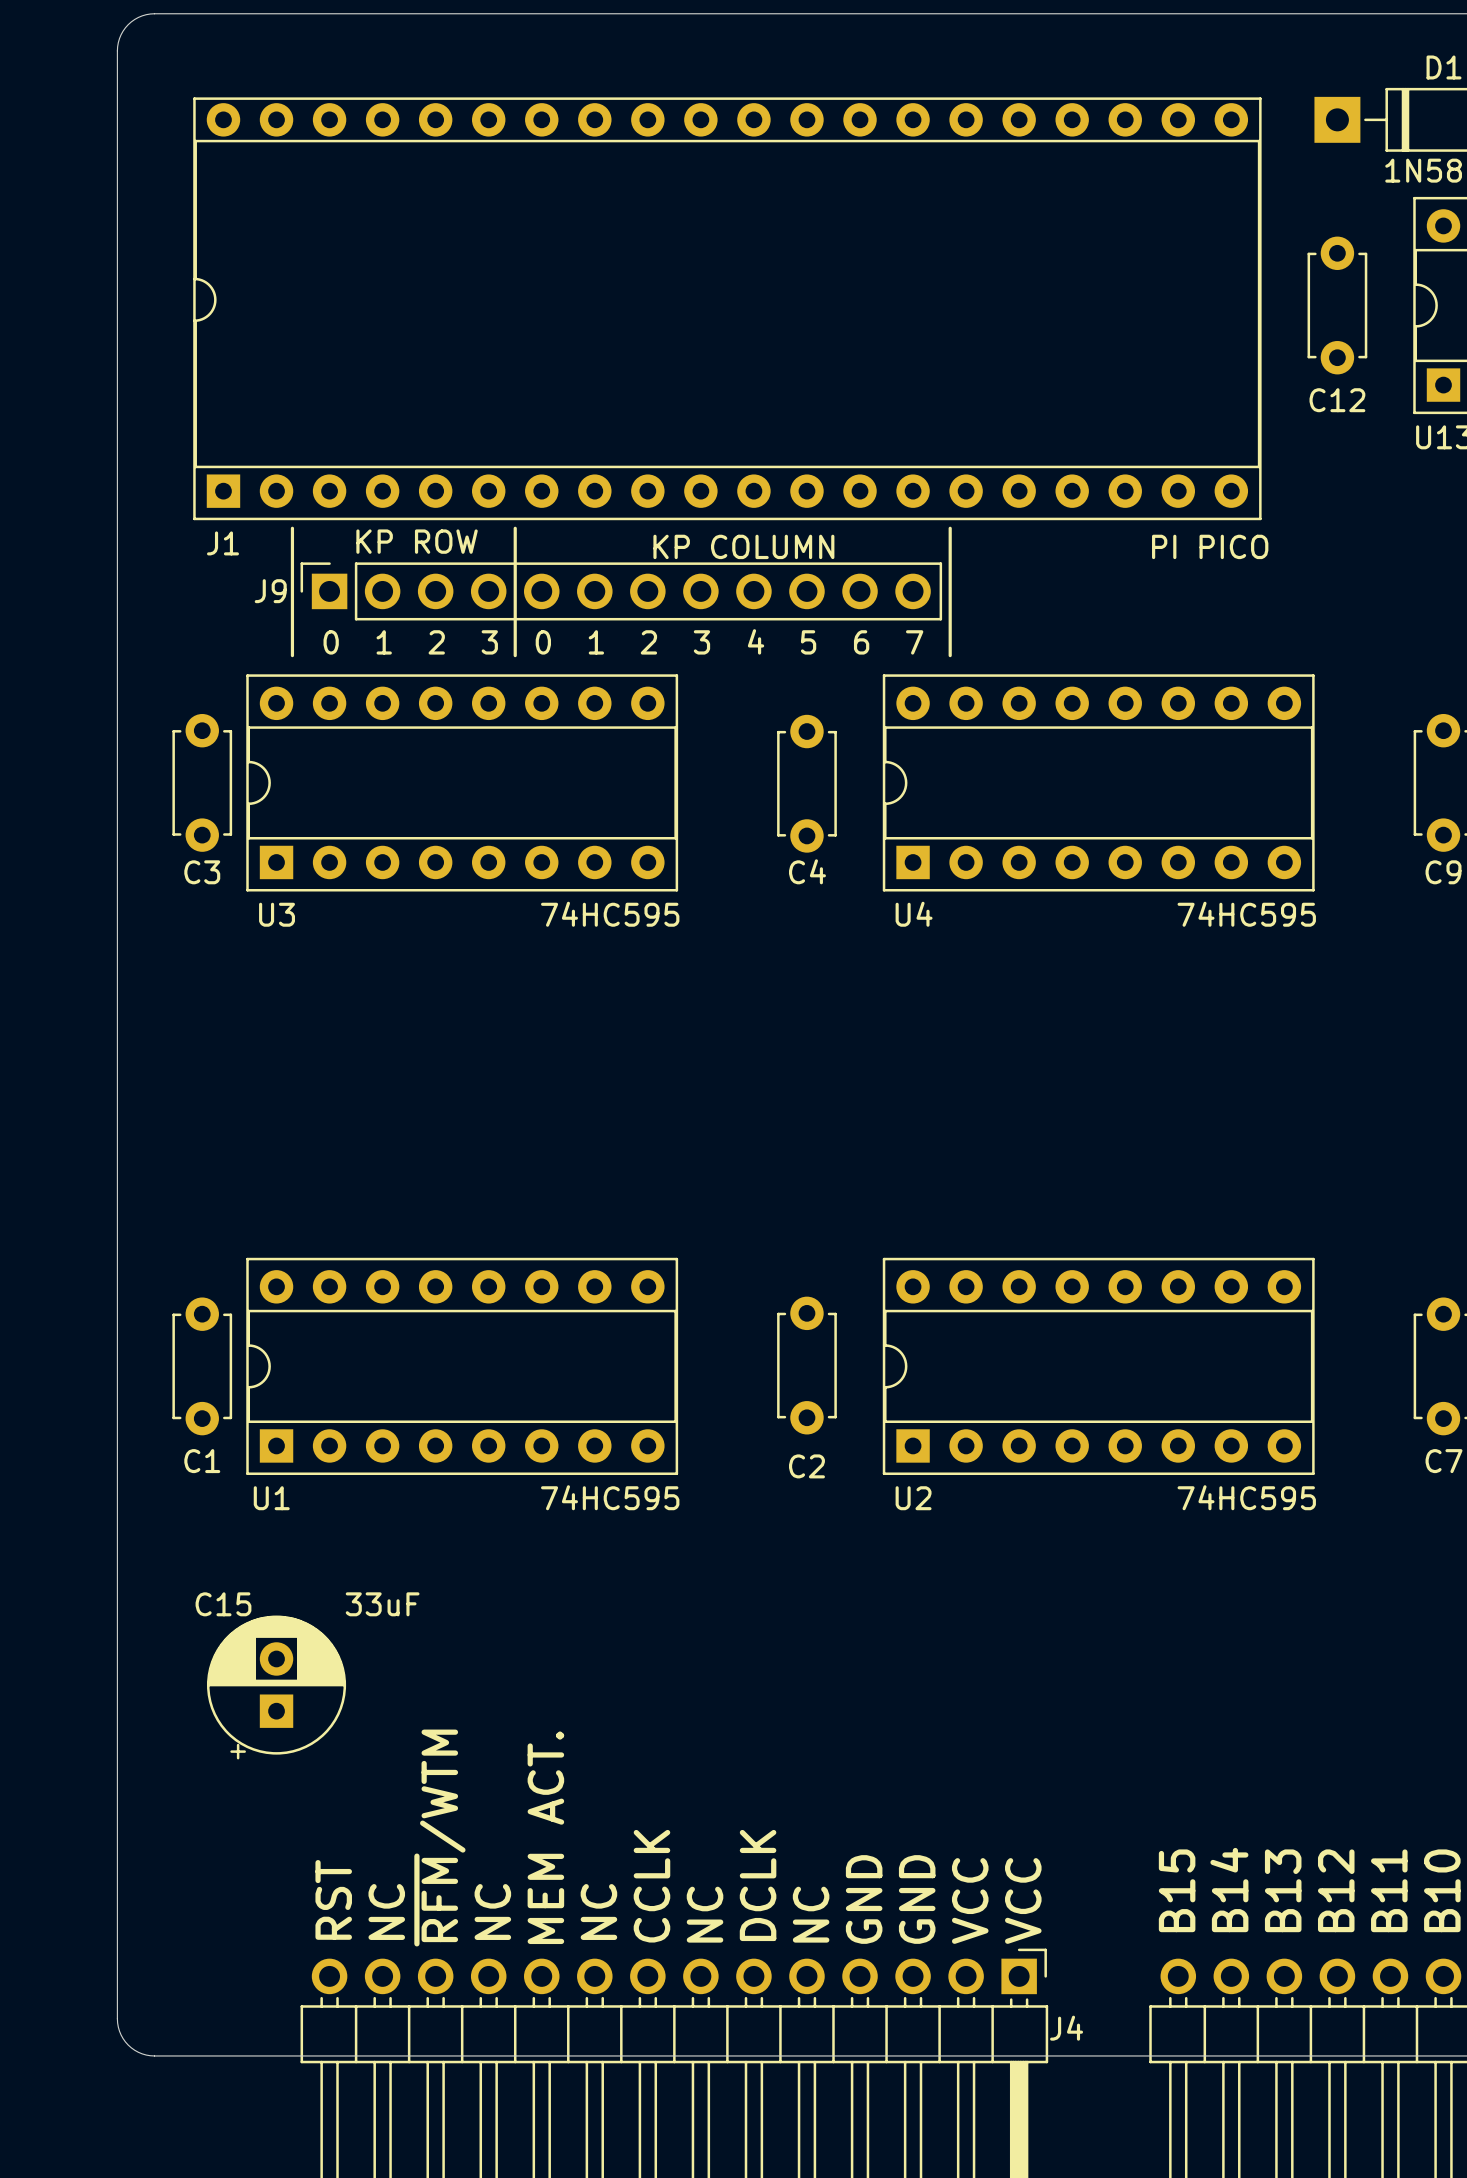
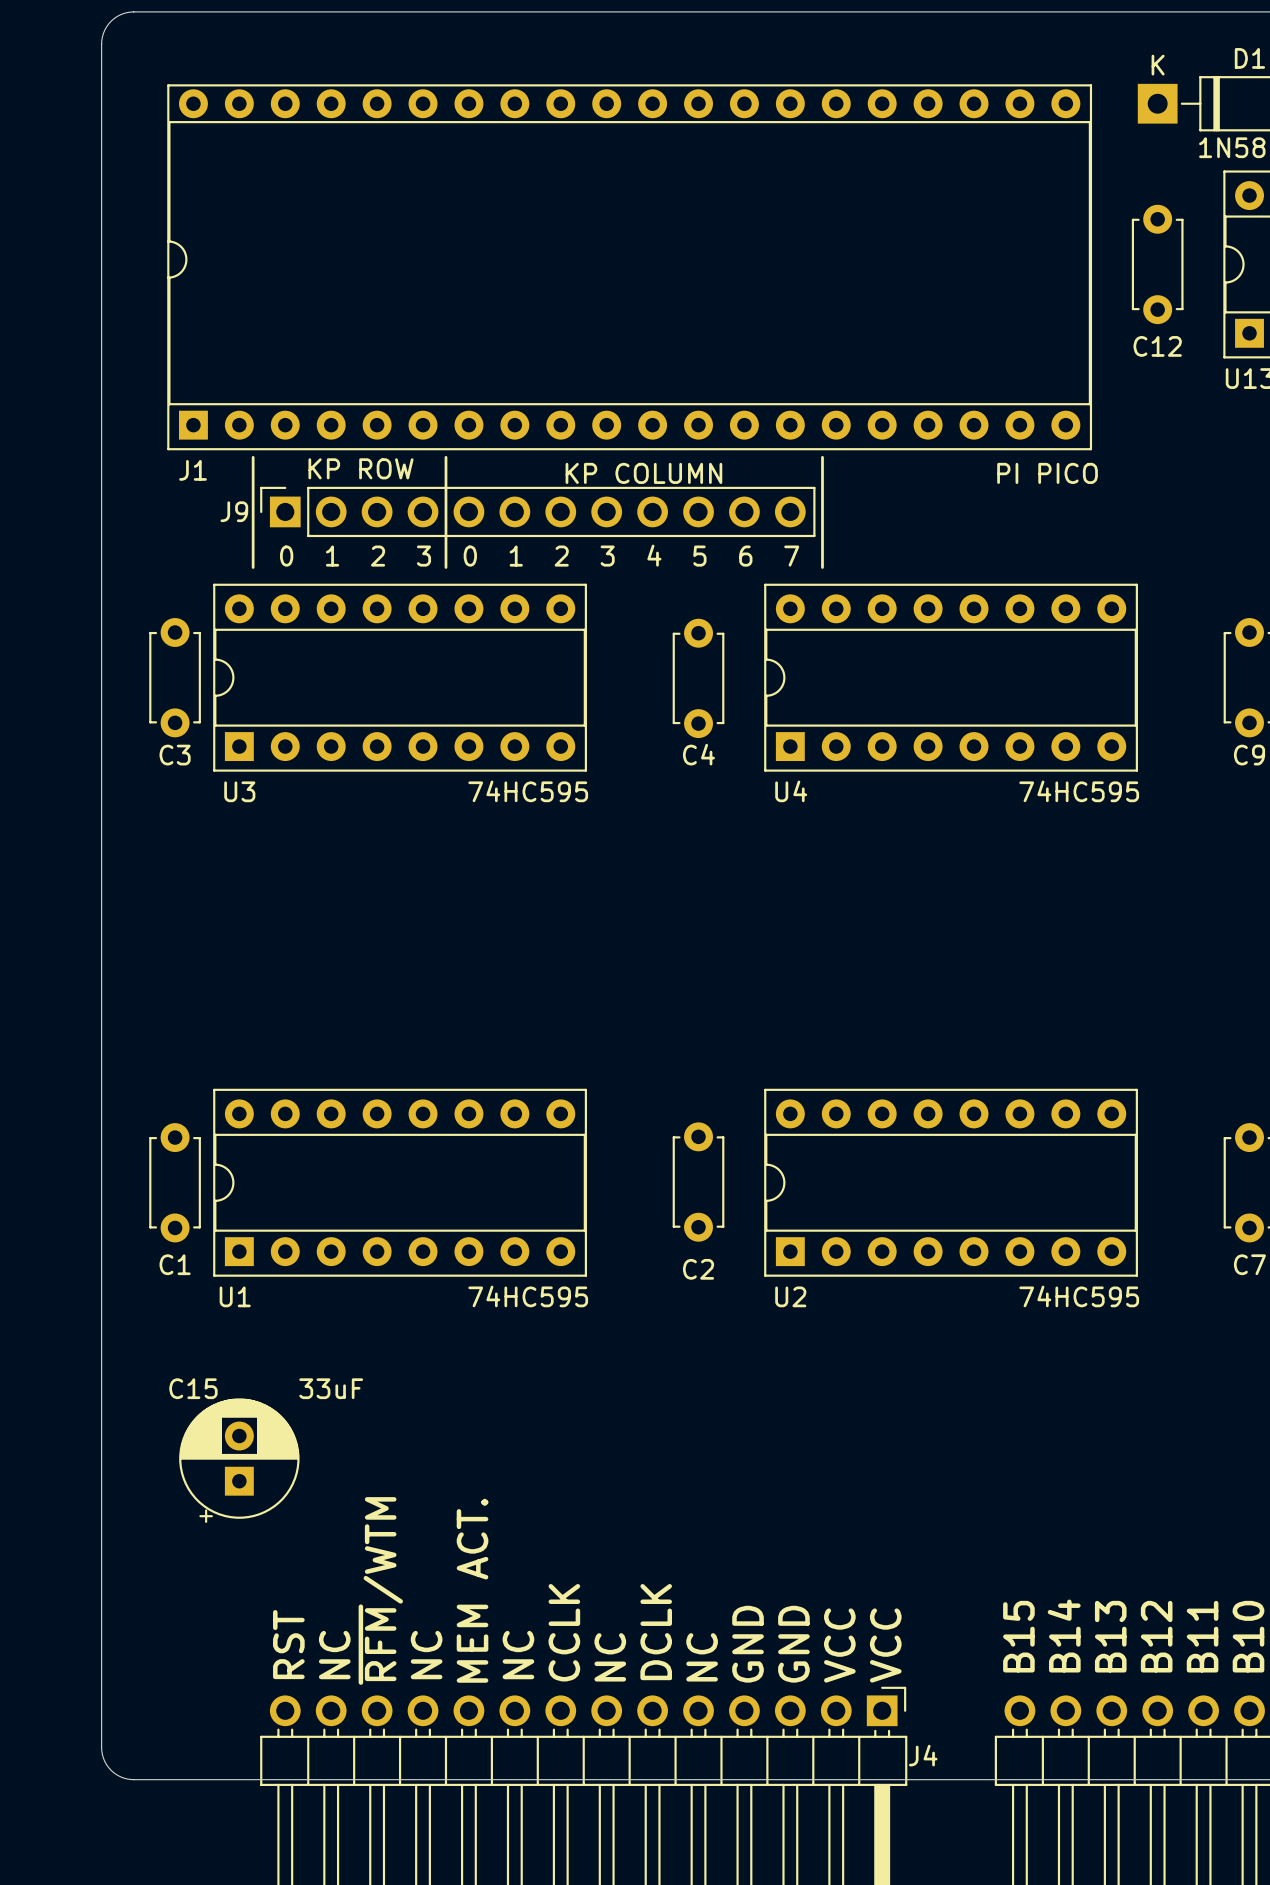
D1 text: none -> K (1158, 65)

